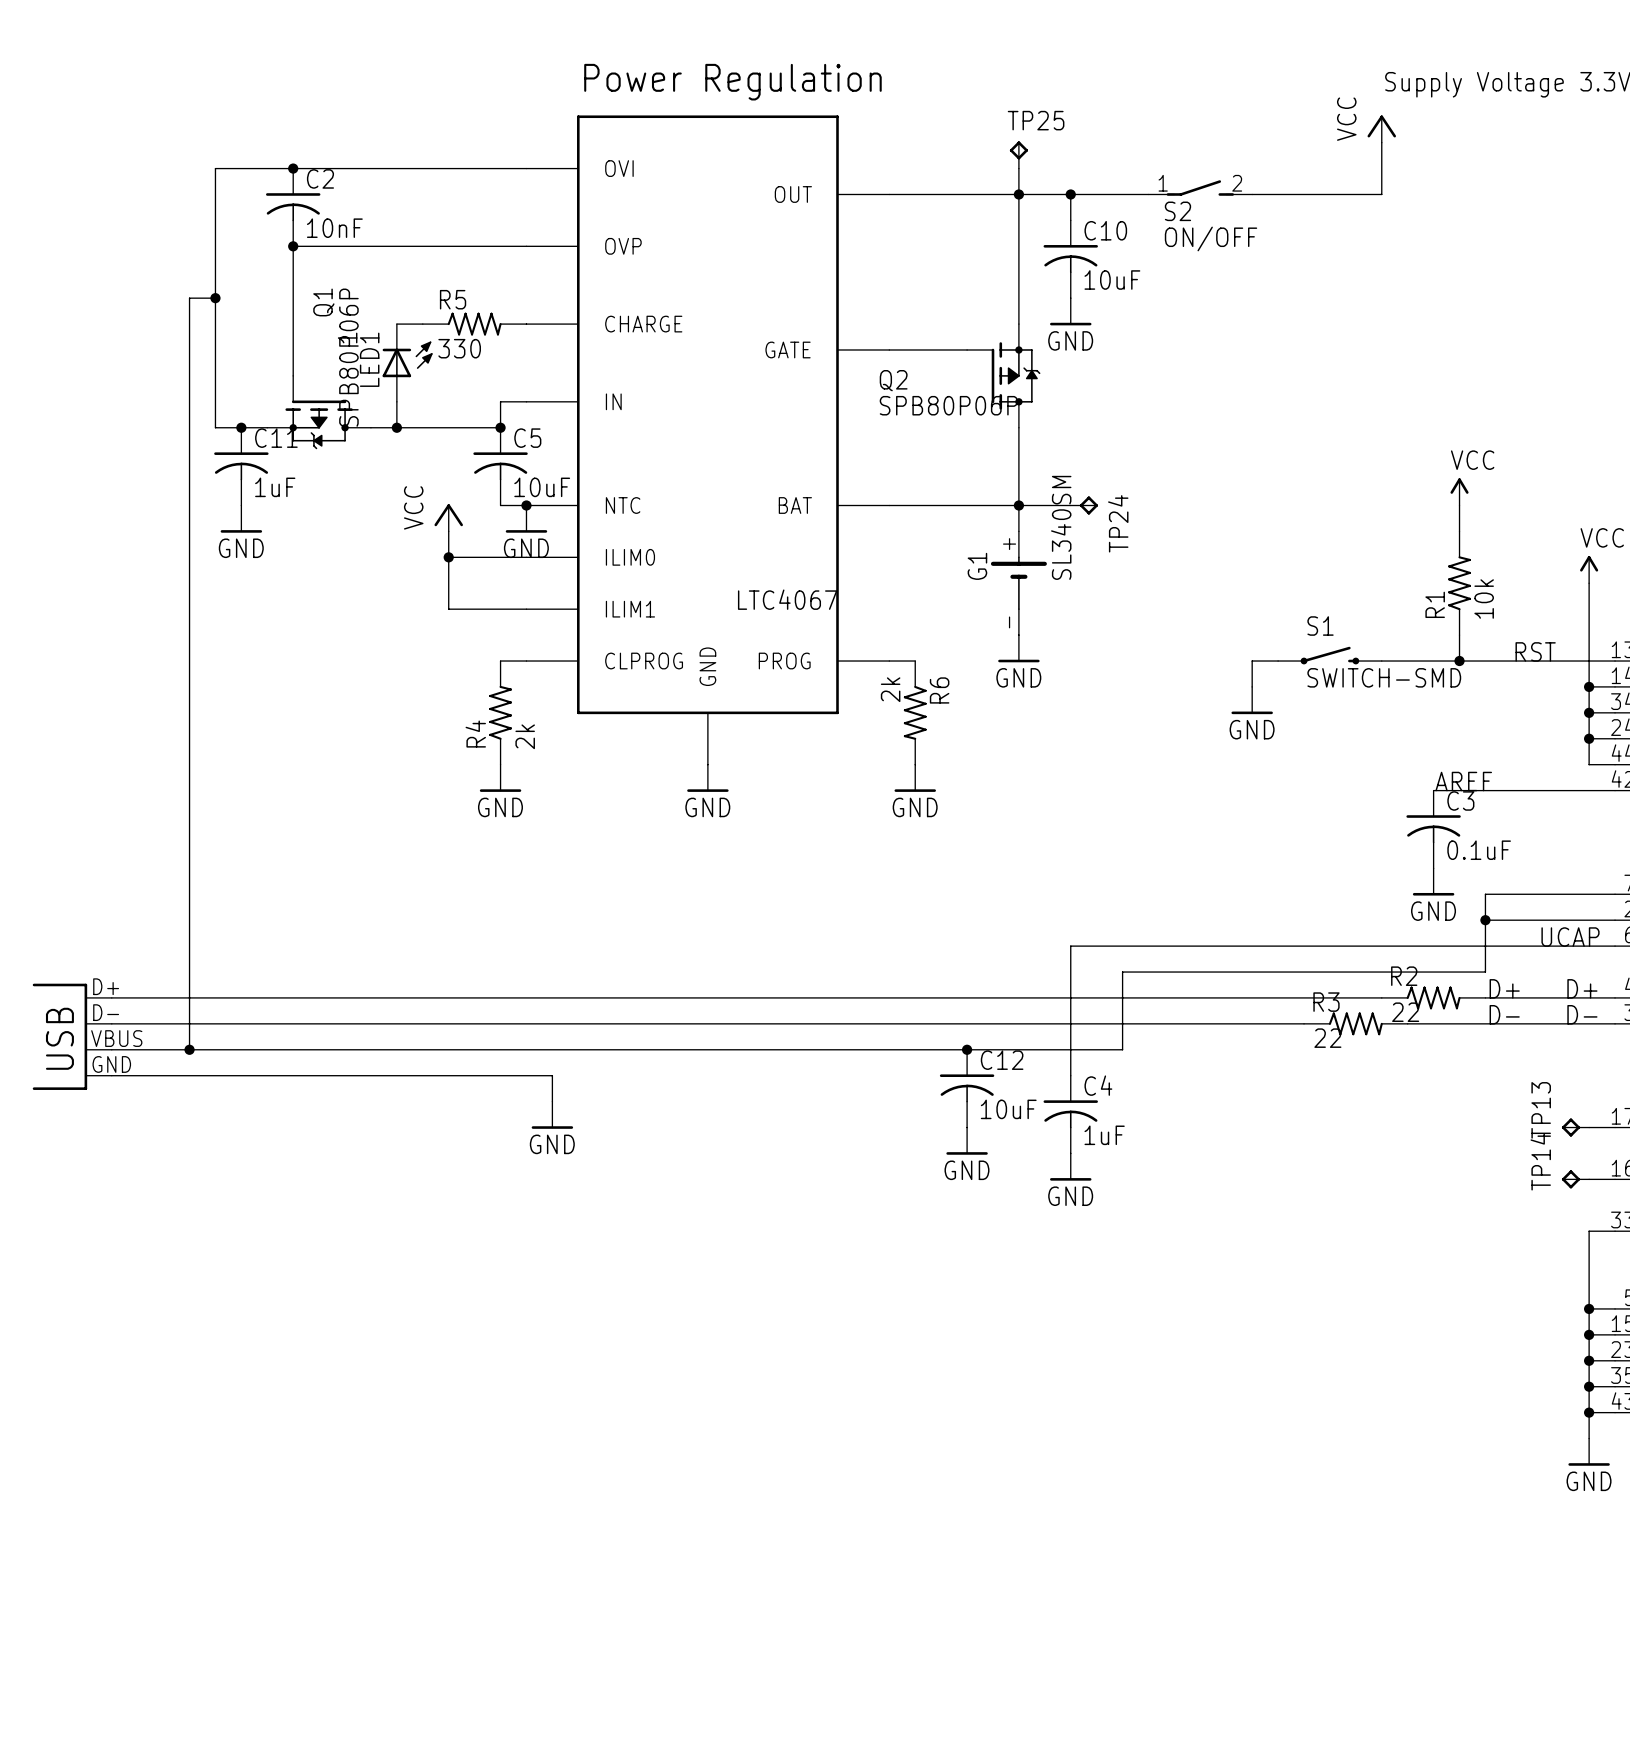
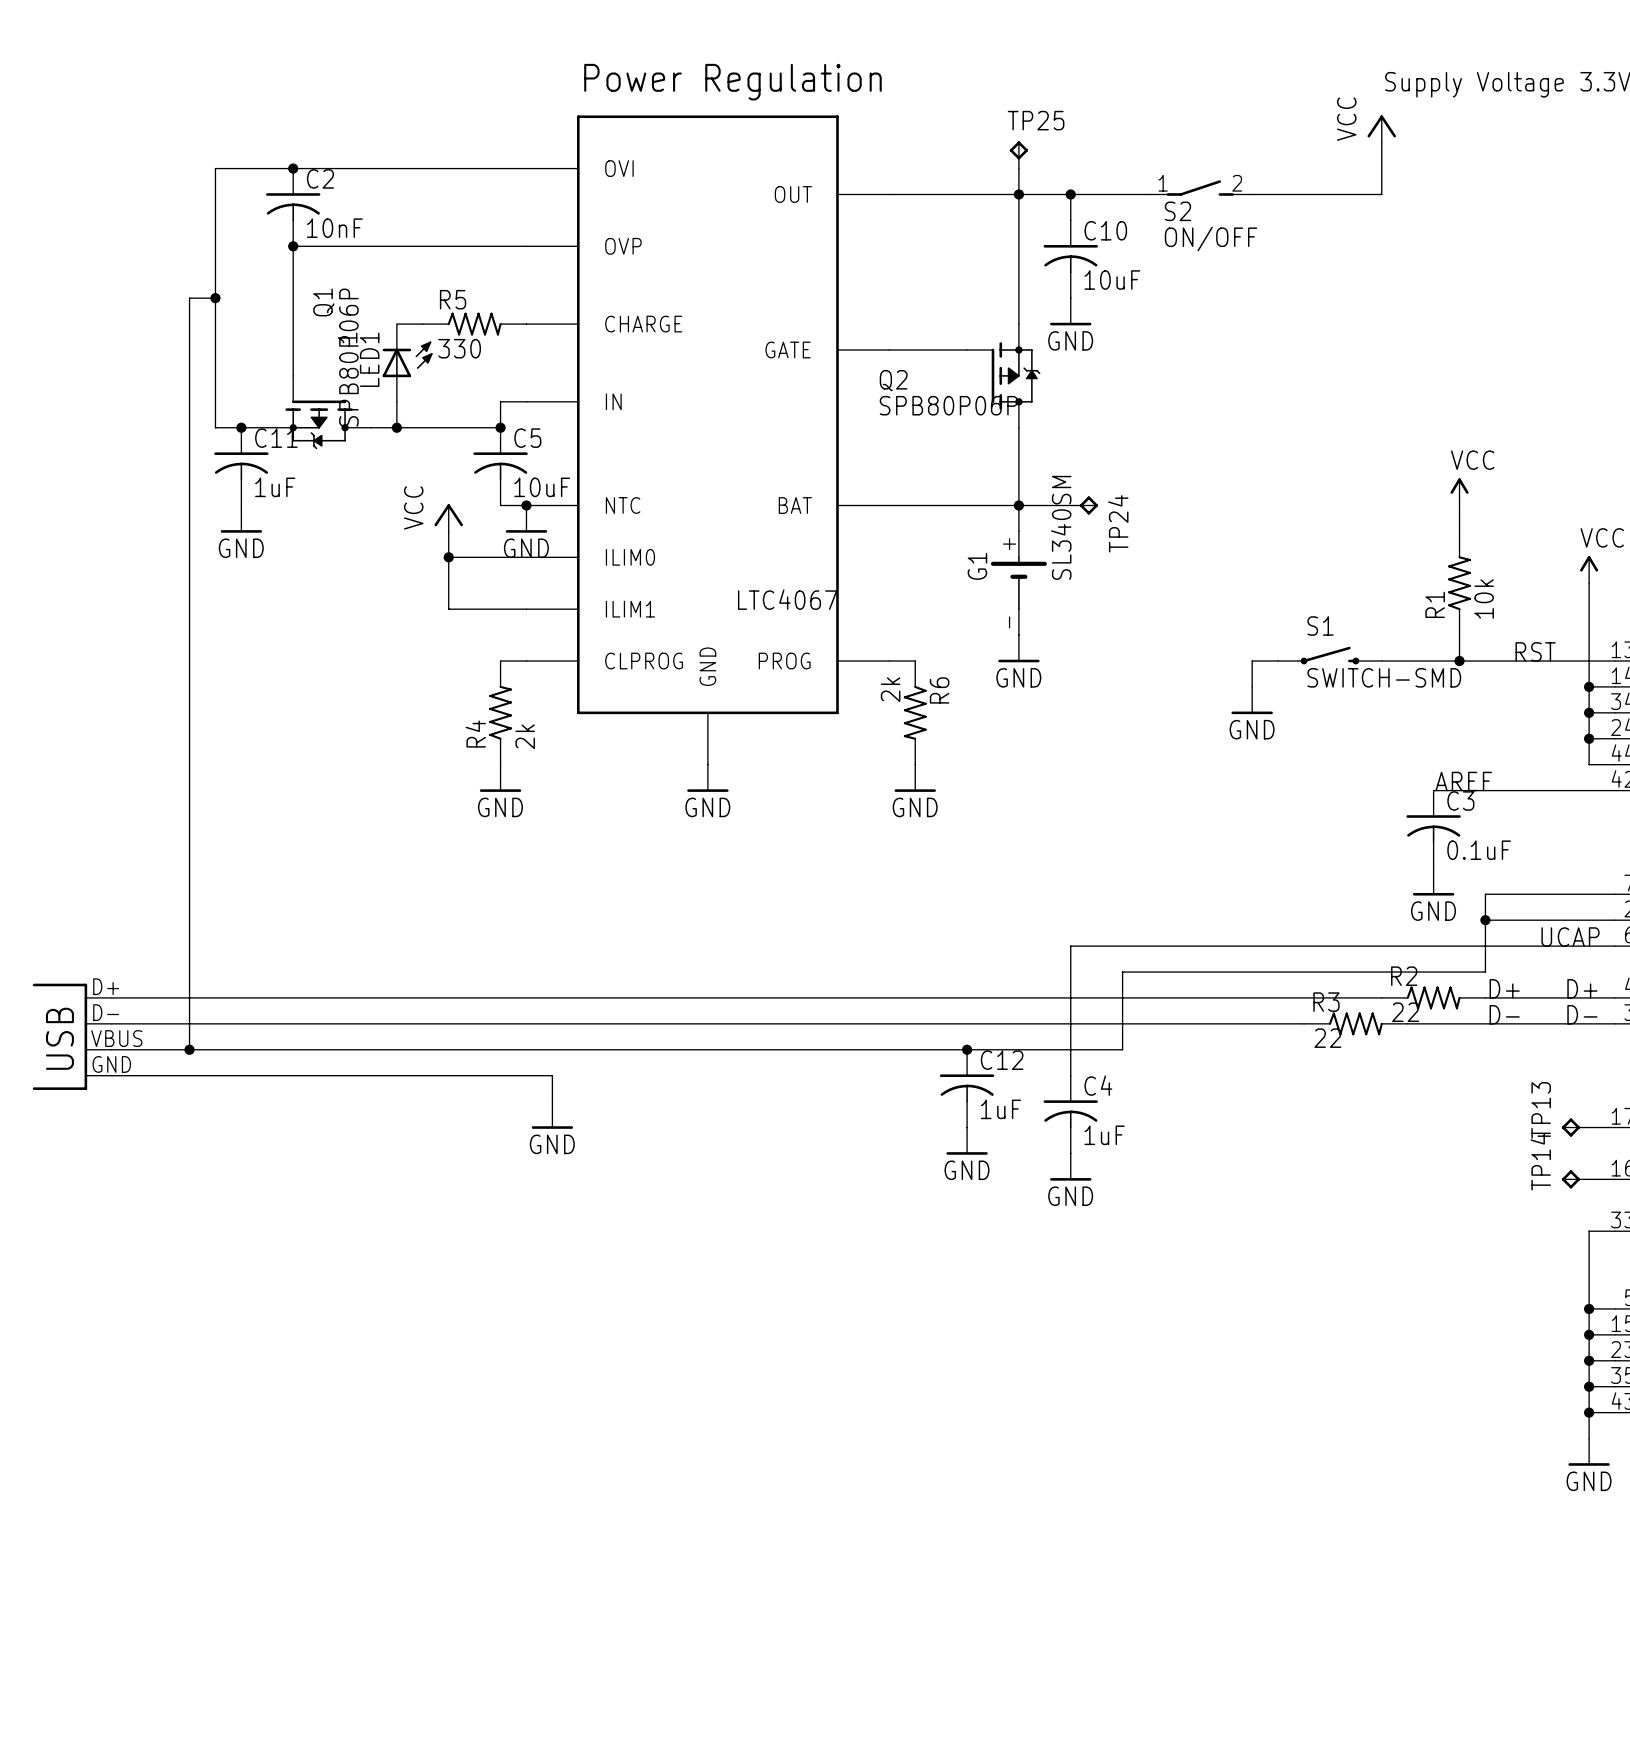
C12 value: 10uF (1008, 1109) -> 1uF (1000, 1109)

